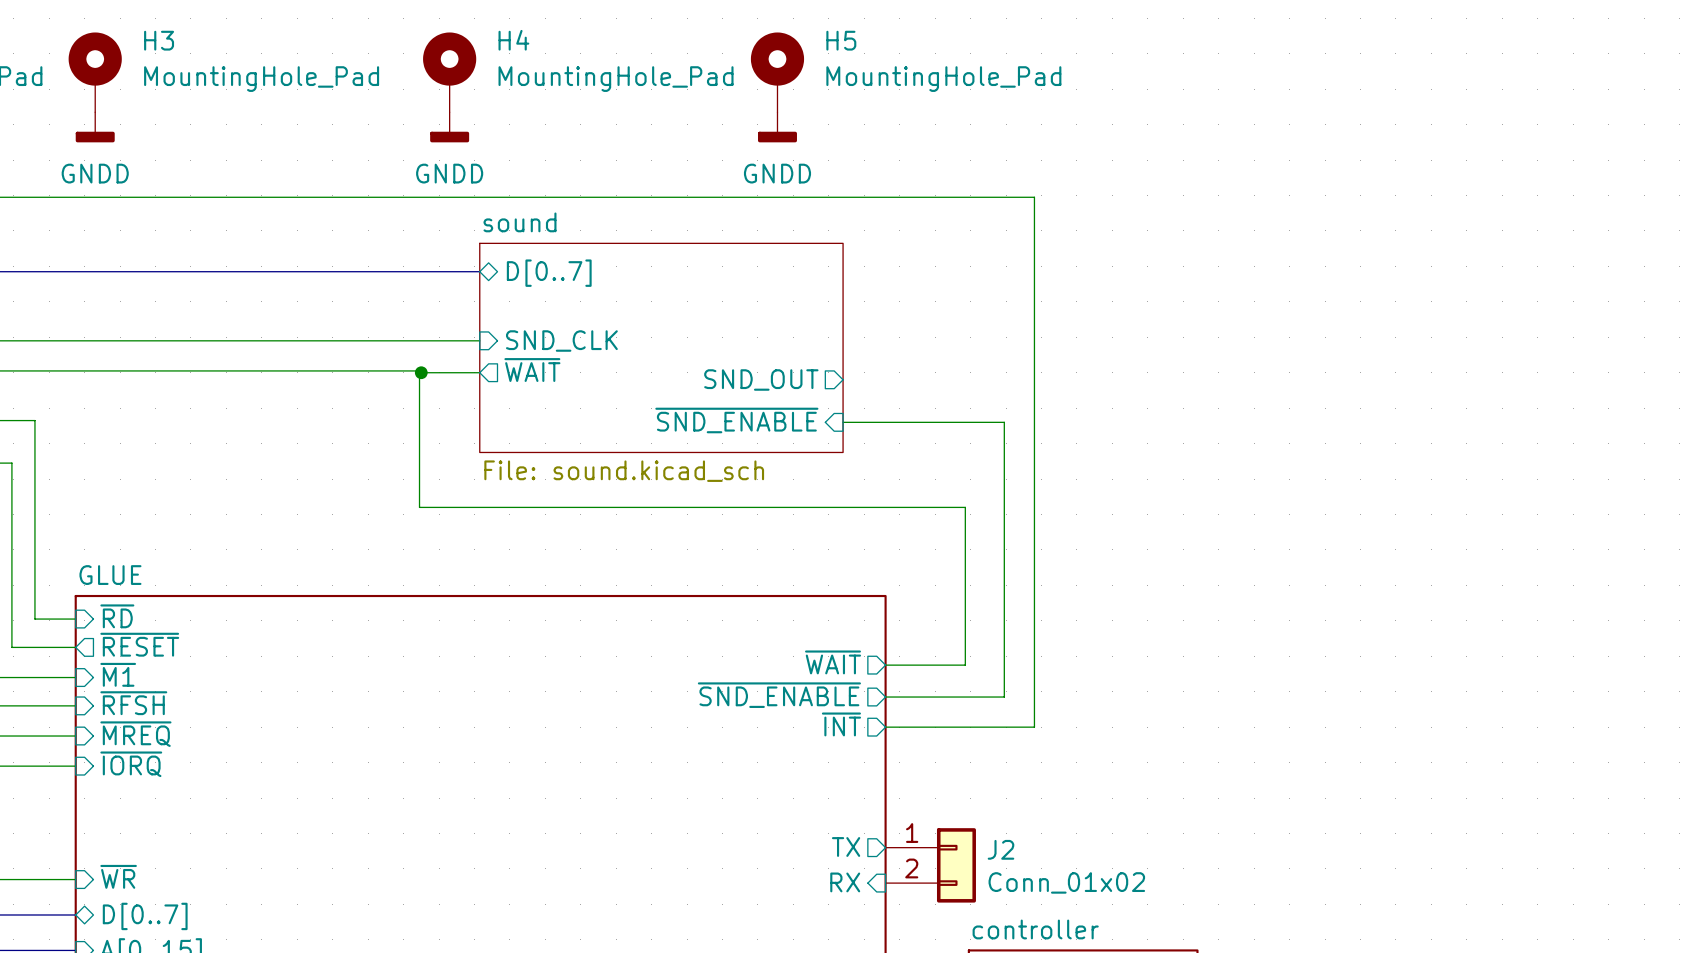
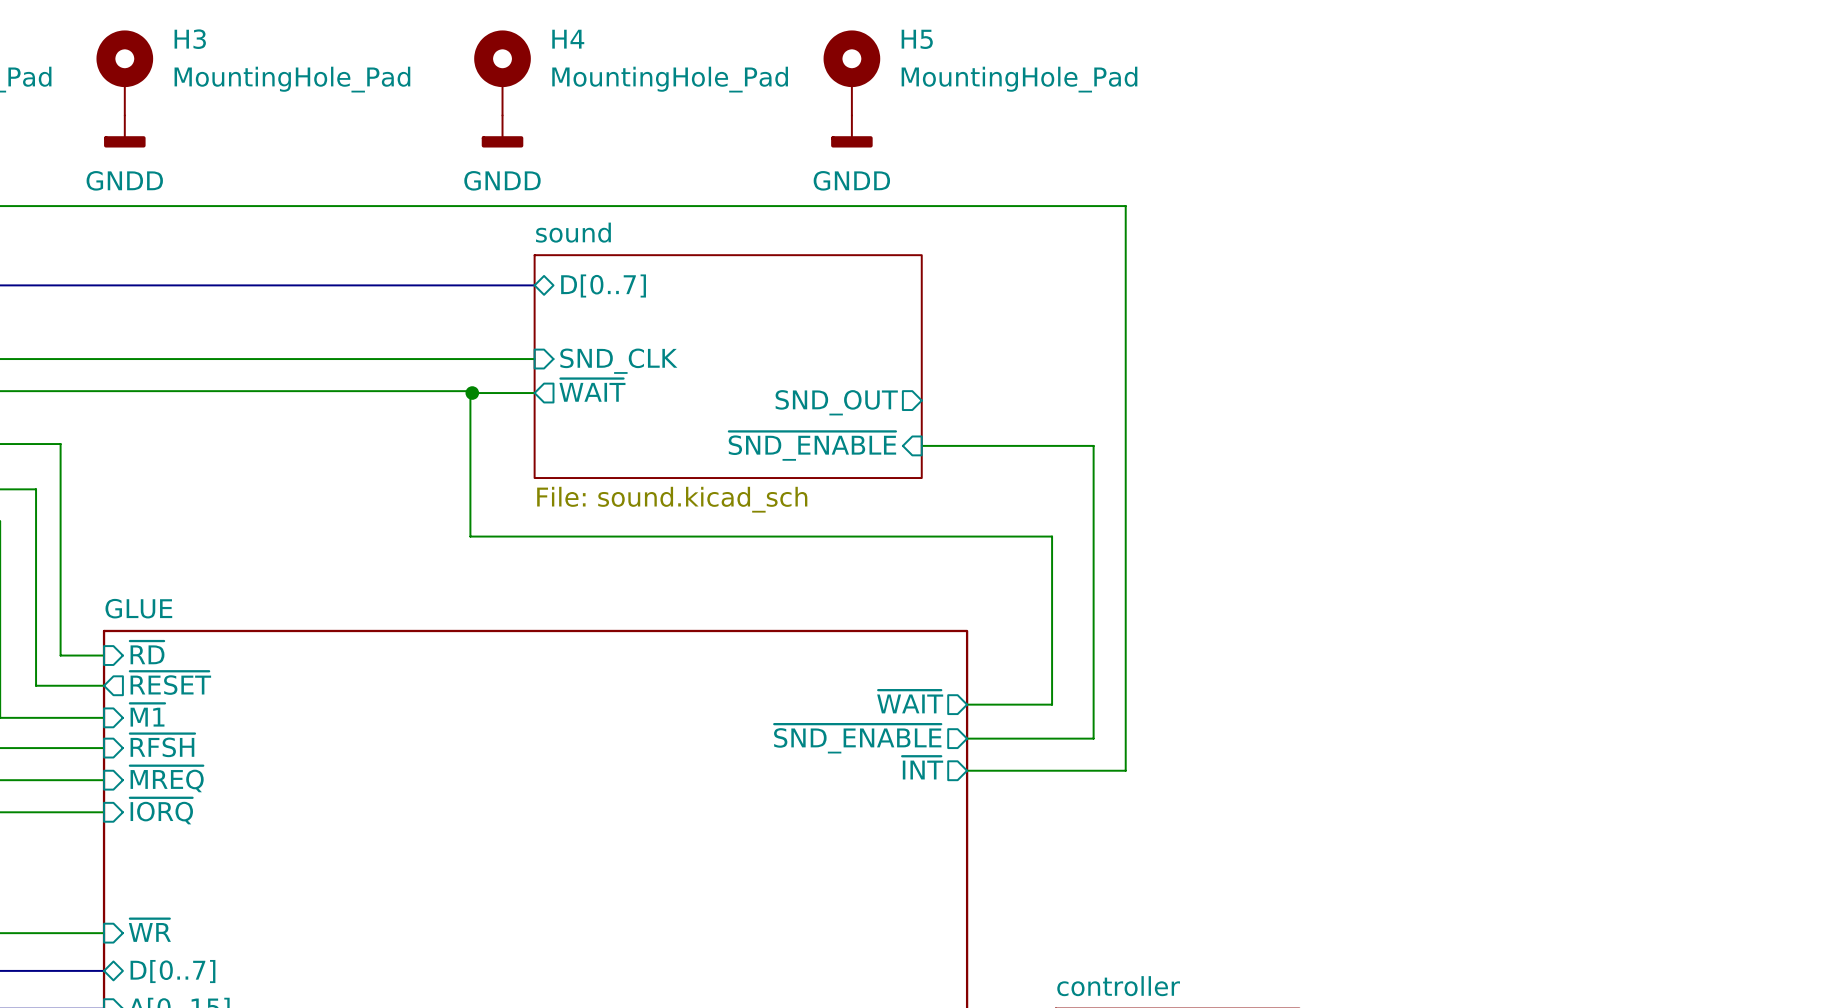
sheet pin: TX (846, 846) -> none
J2: Conn_01x02 (930, 865) -> none
sheet pin: RX (845, 882) -> none

